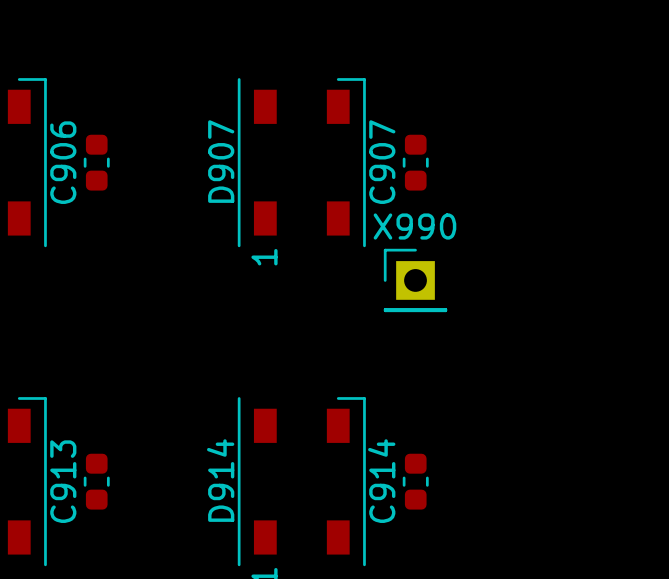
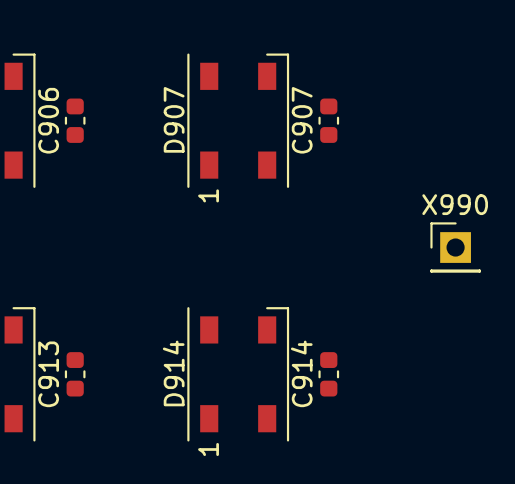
X990 position: (415, 280) -> (455, 247)

